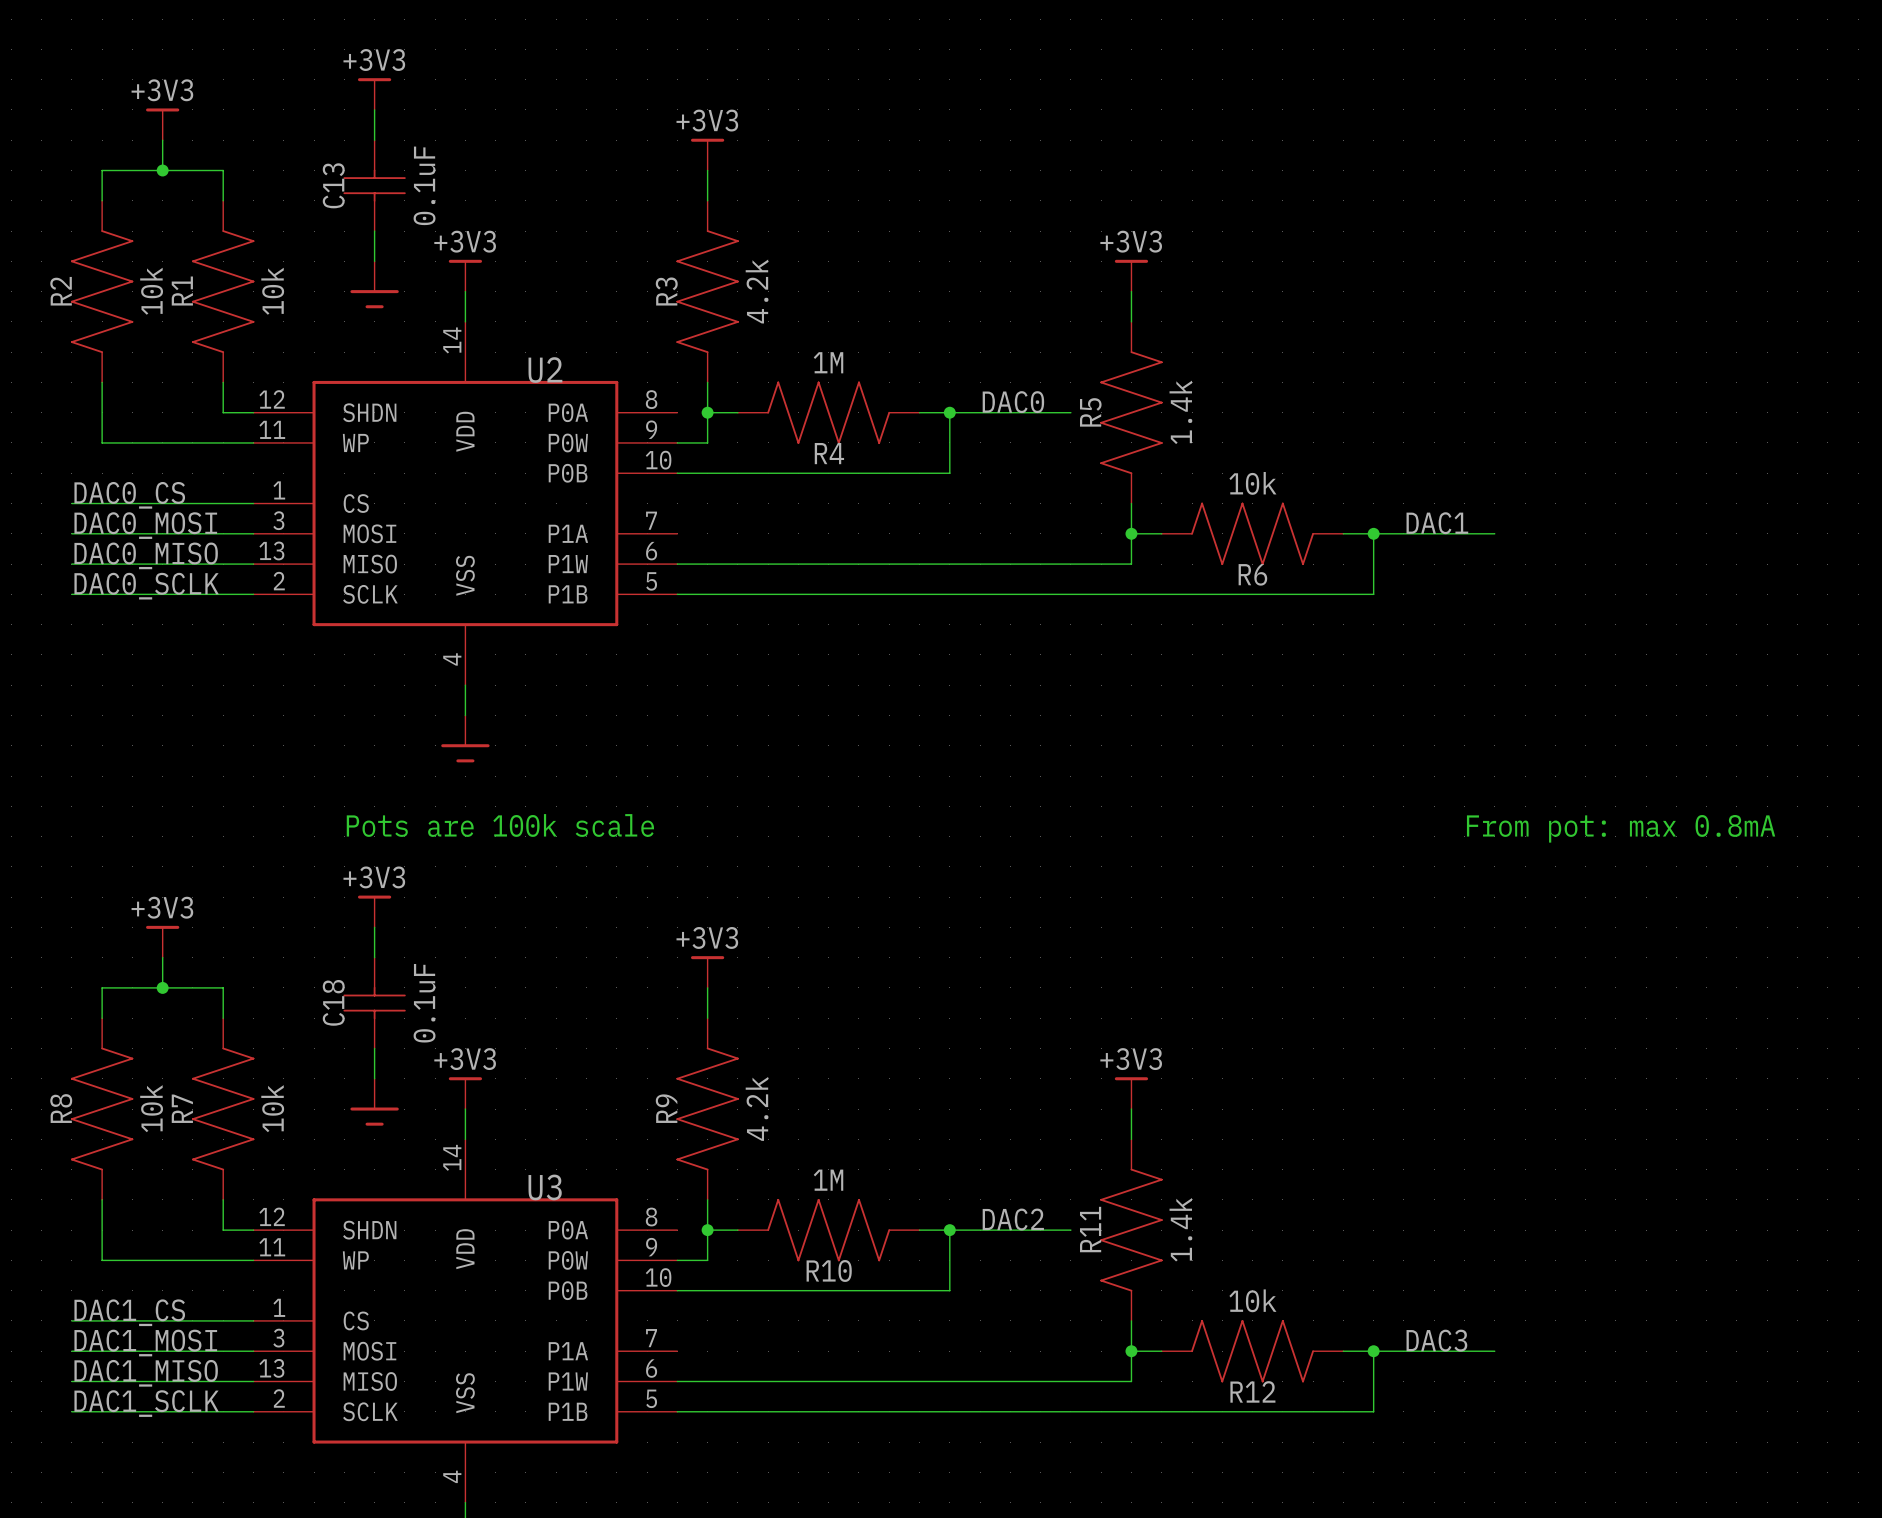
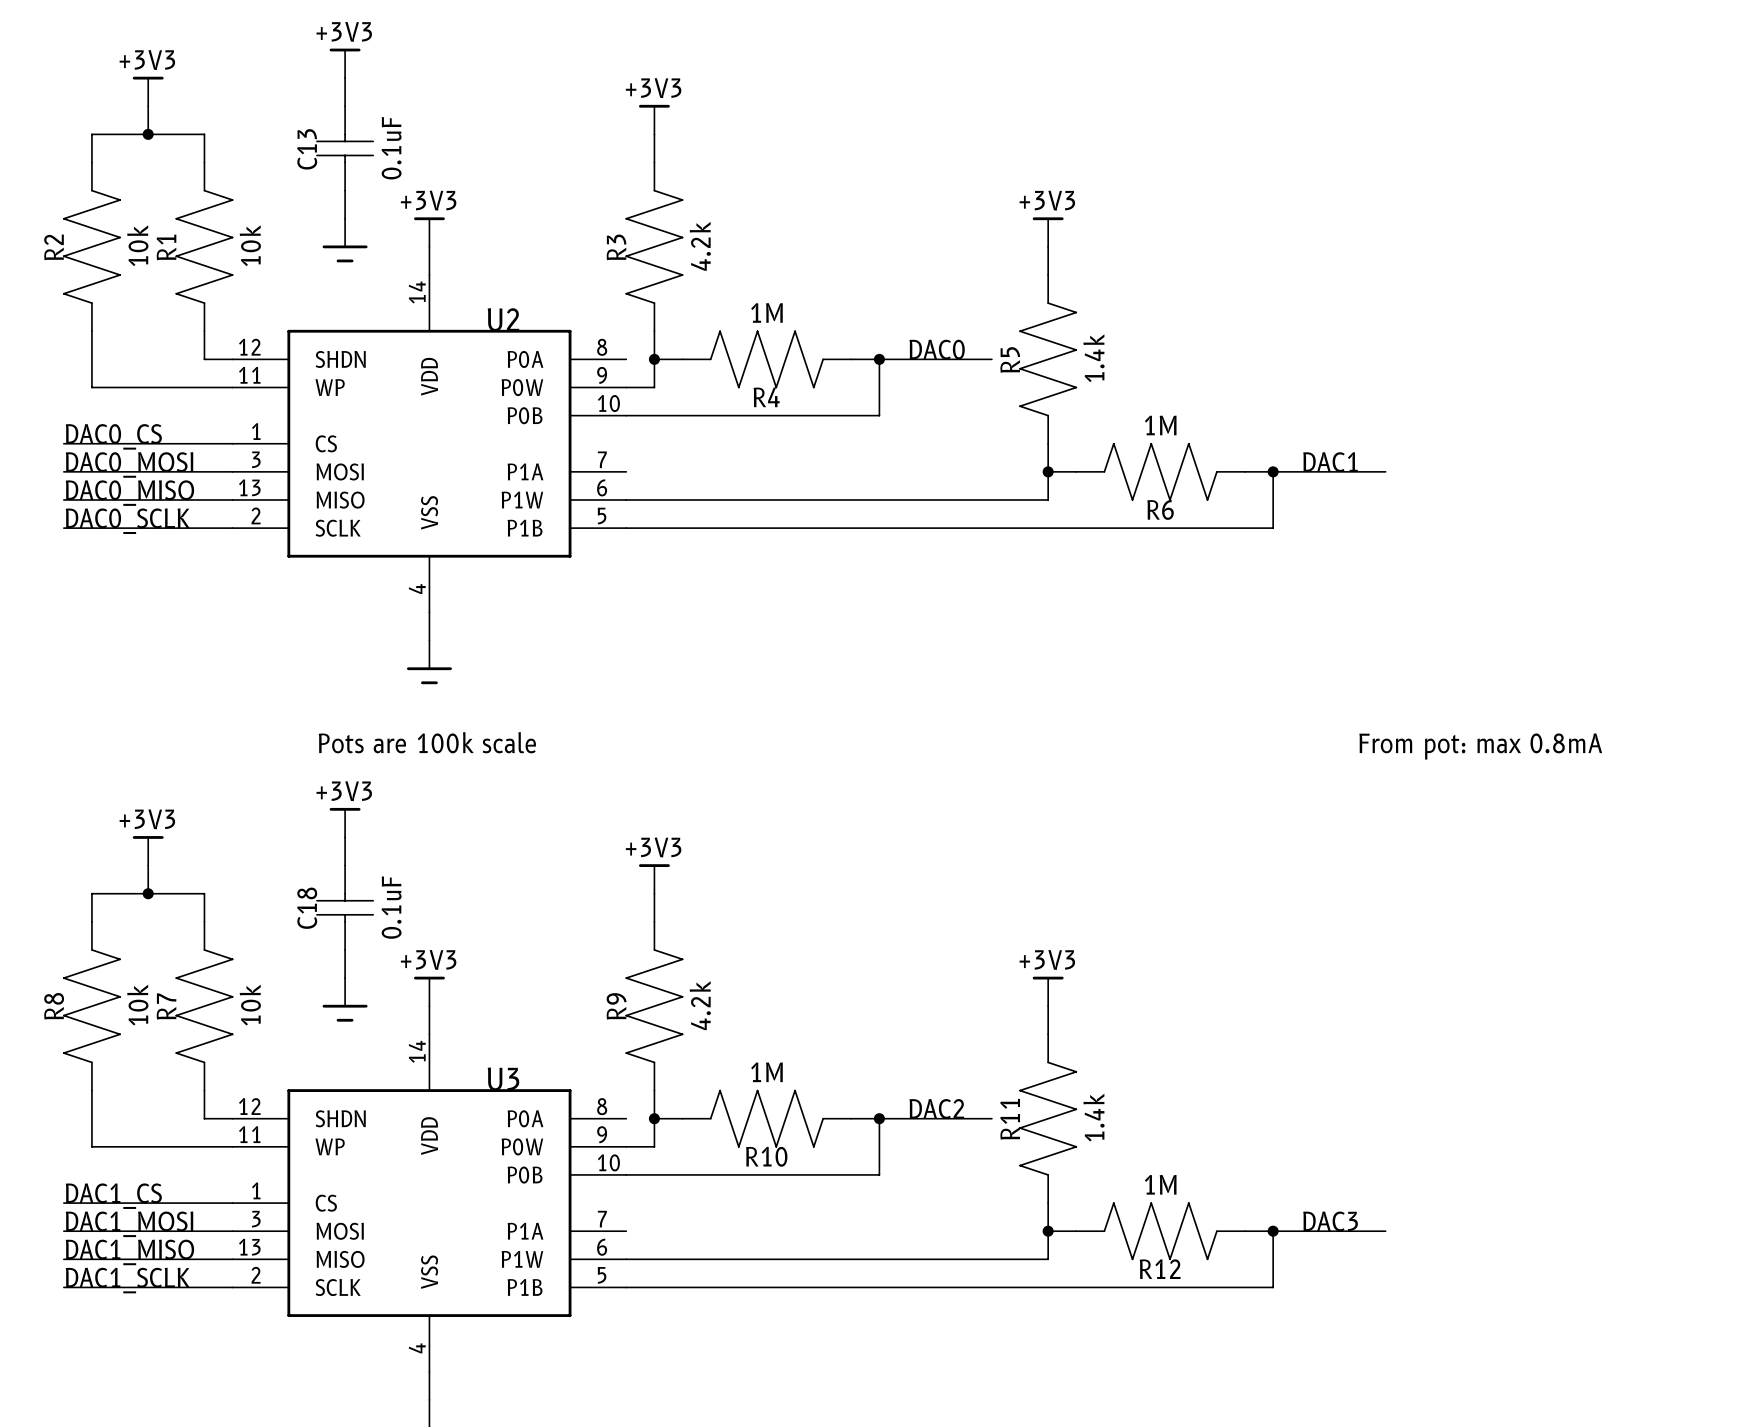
R6 value: 10k (1252, 483) -> 1M (1160, 425)
R12 value: 10k (1252, 1300) -> 1M (1160, 1184)

